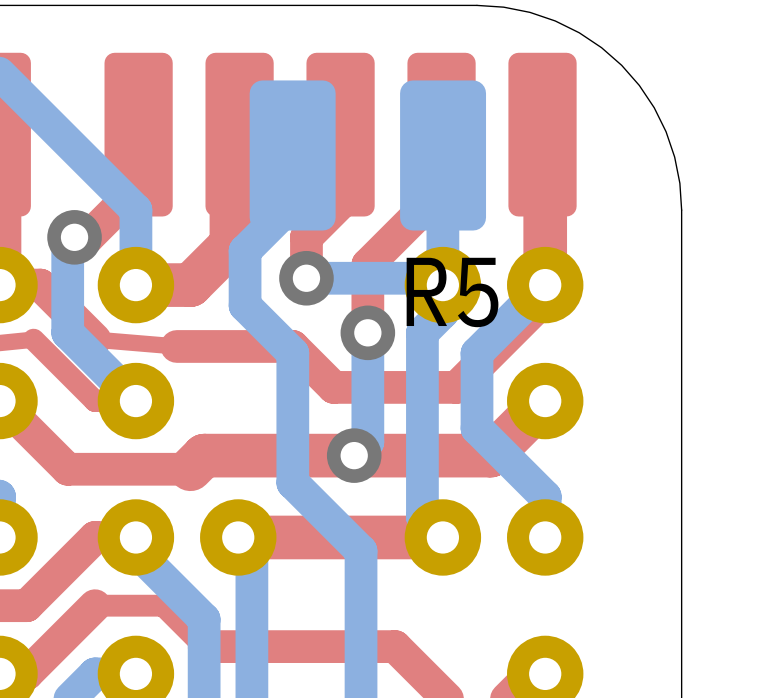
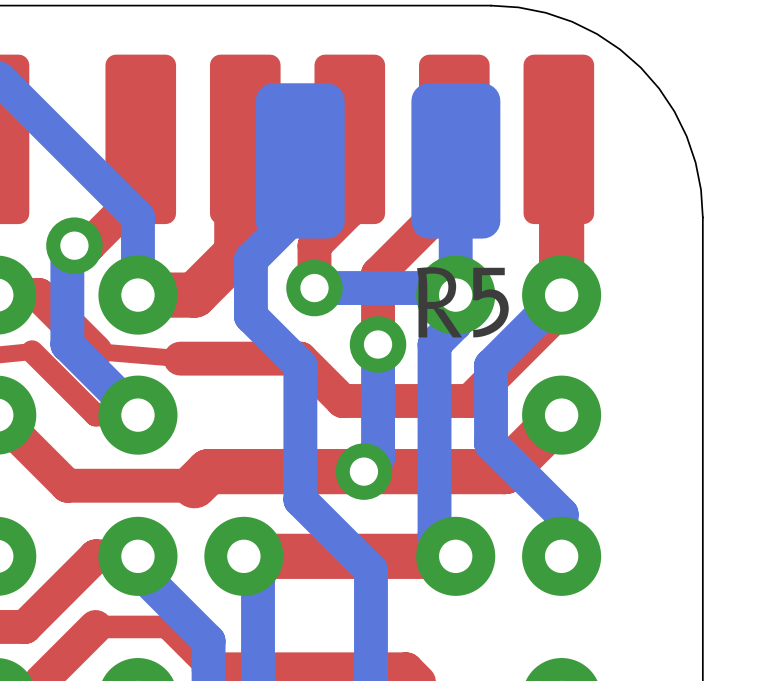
R5 footprint: [249, 80, 487, 231] -> [255, 83, 501, 239]

